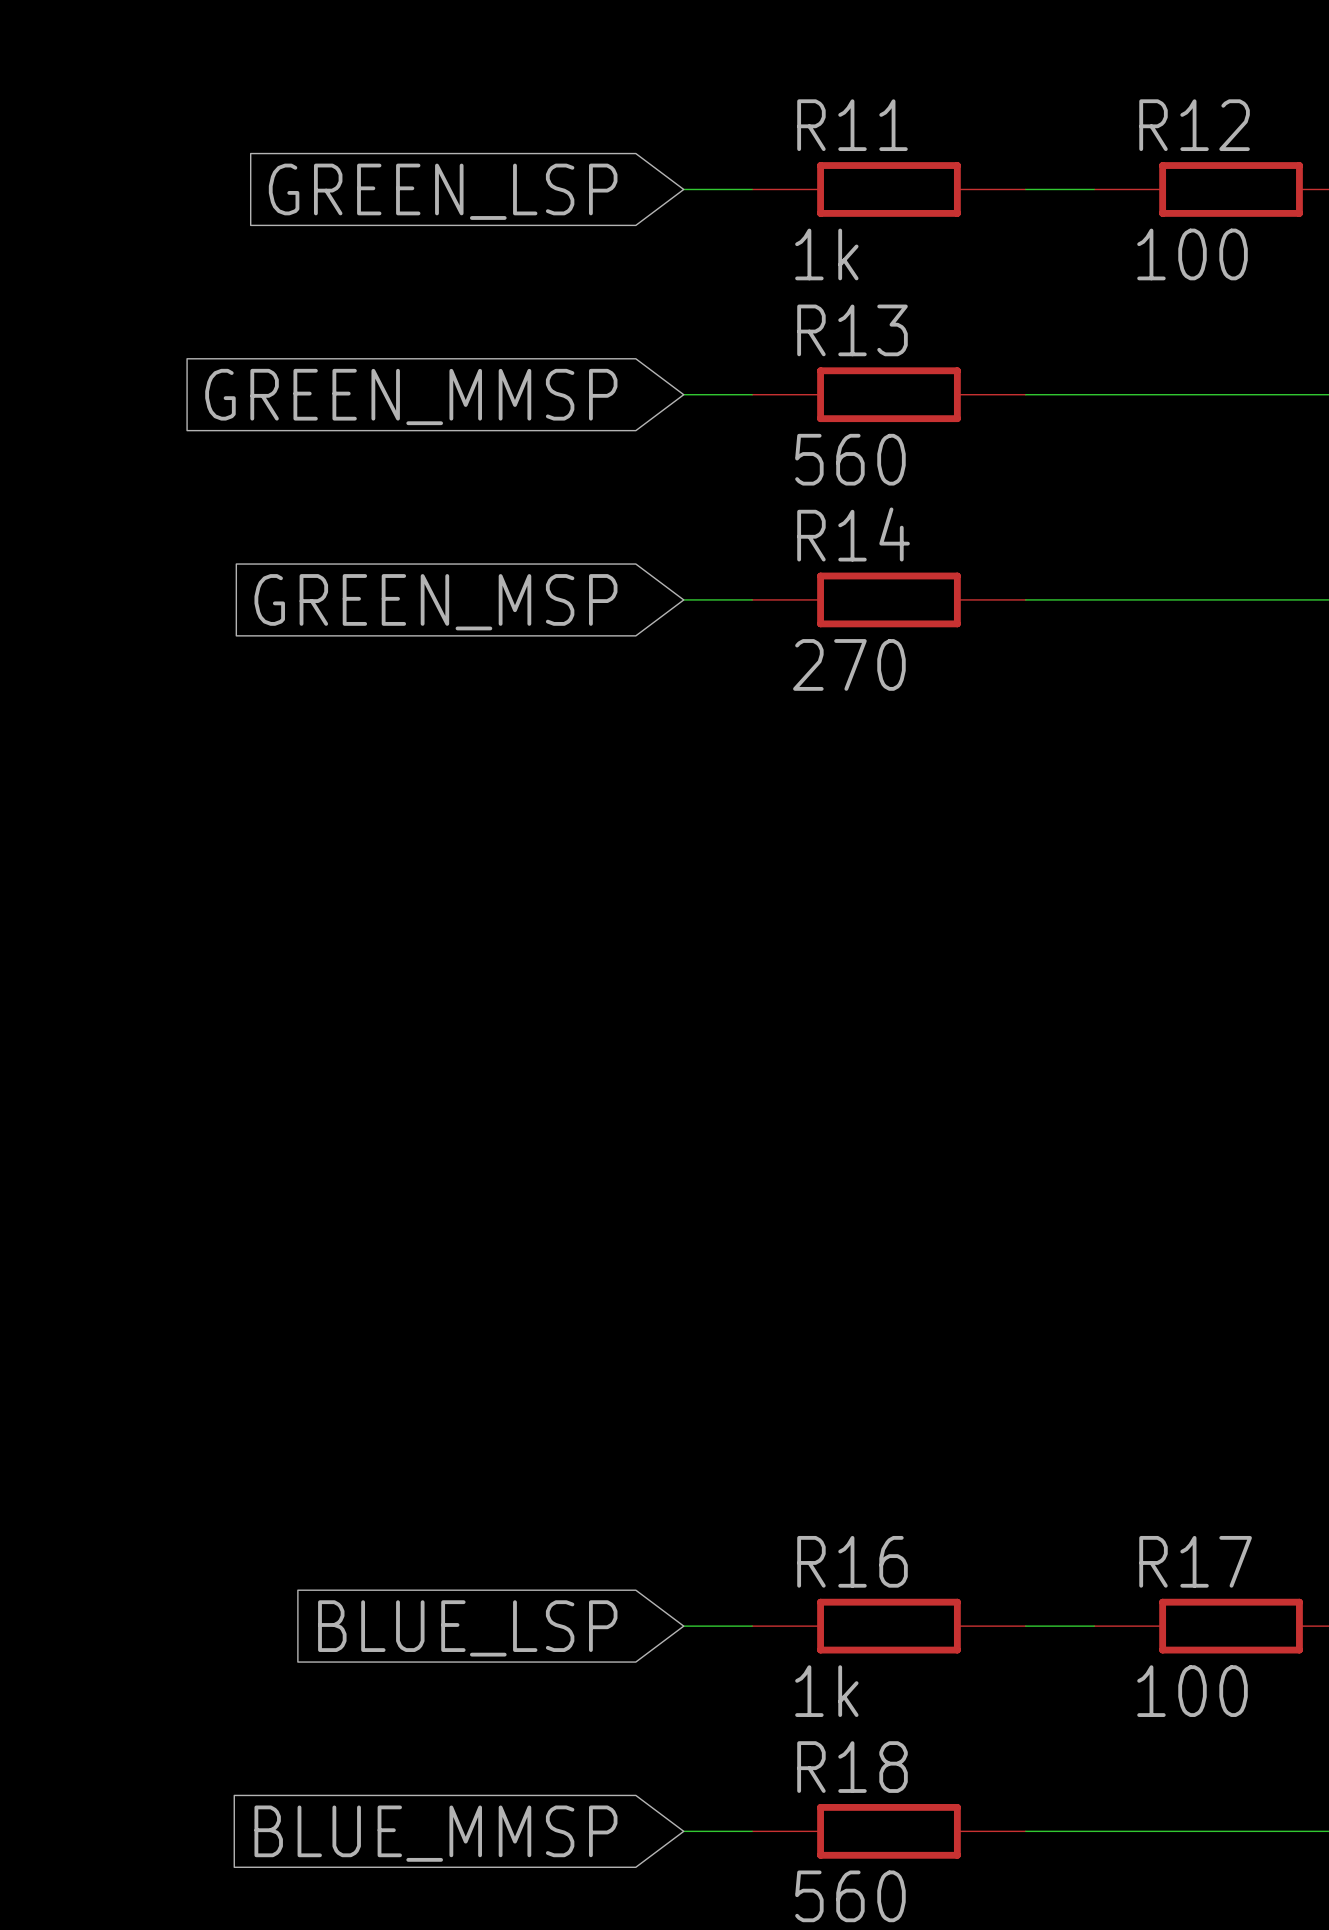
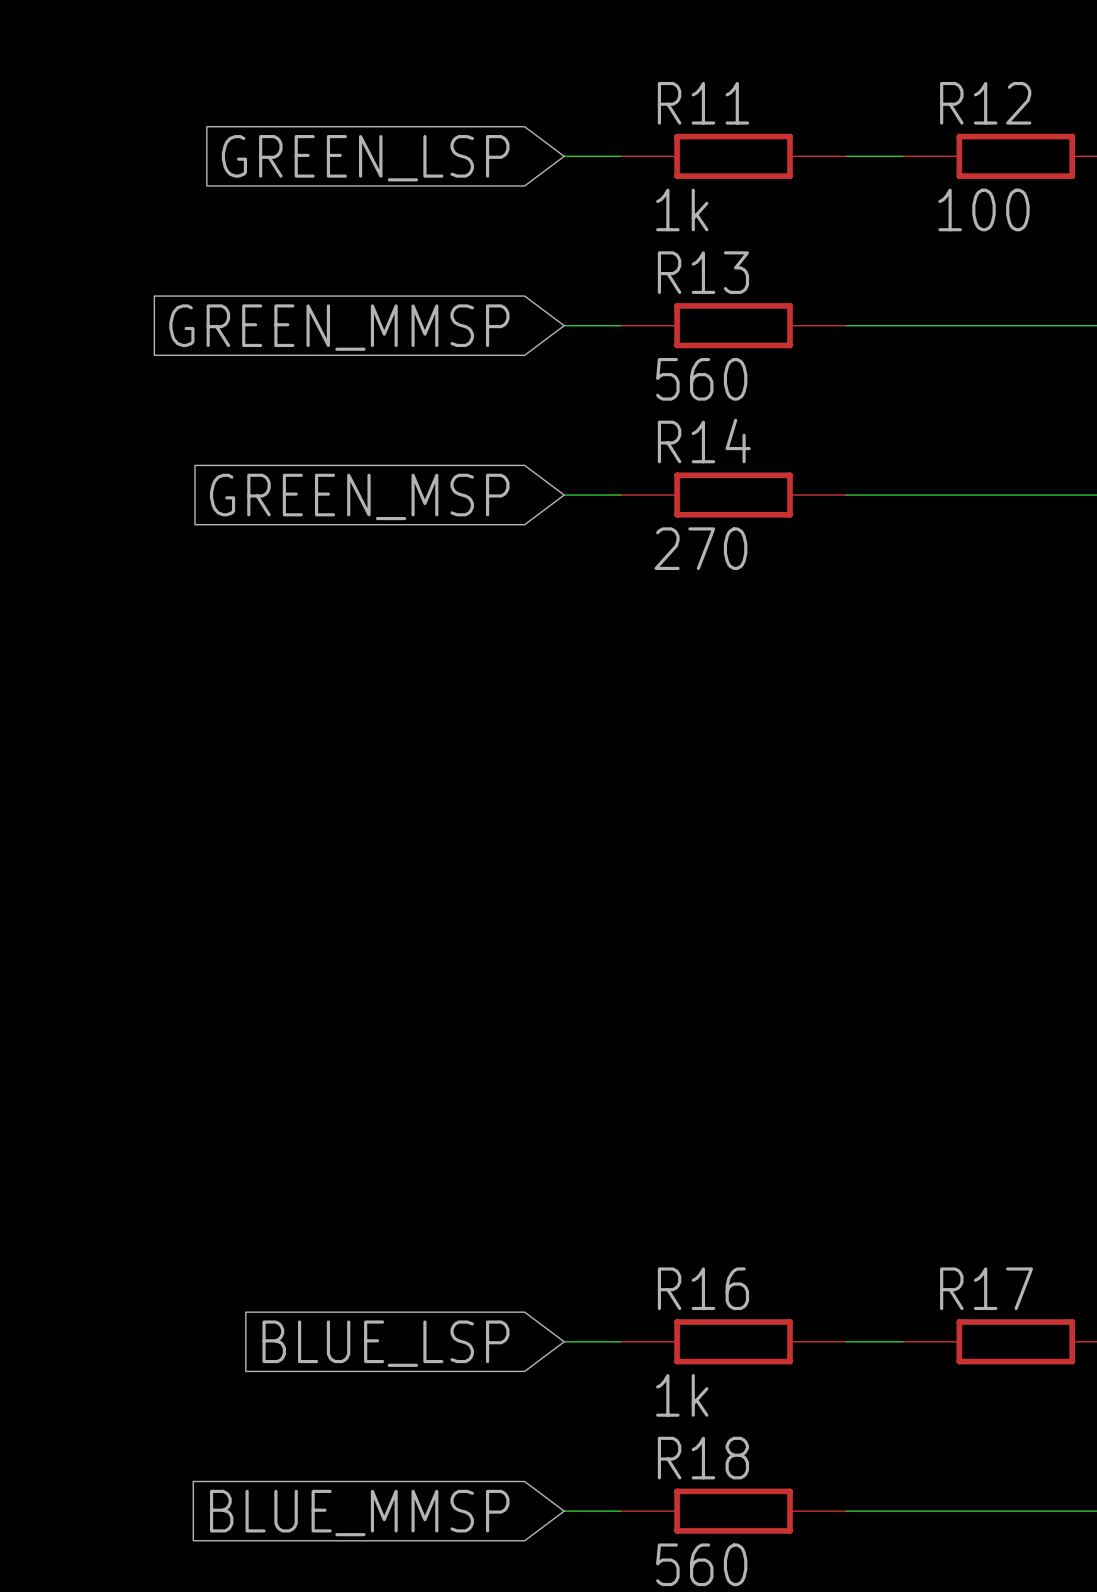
R17 value: 100 (1192, 1691) -> none

